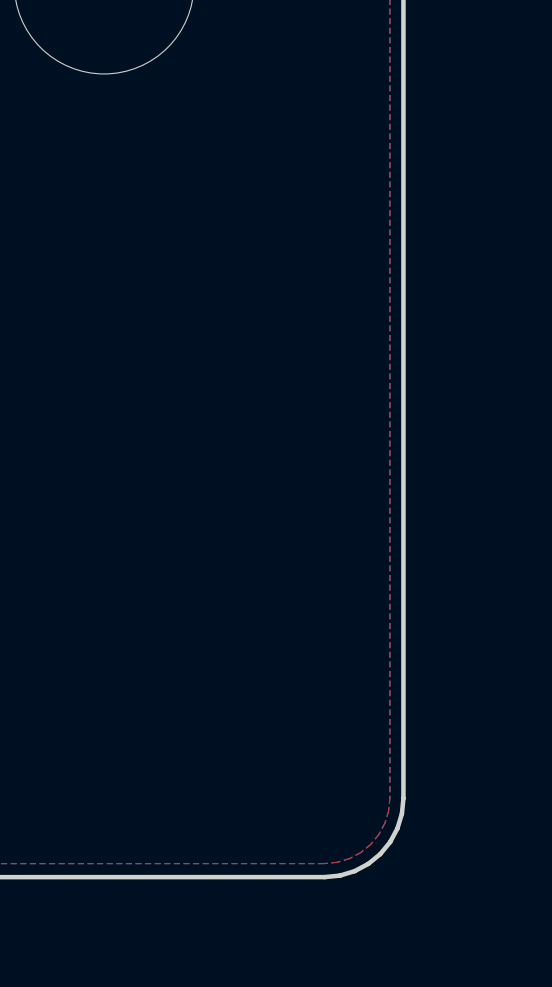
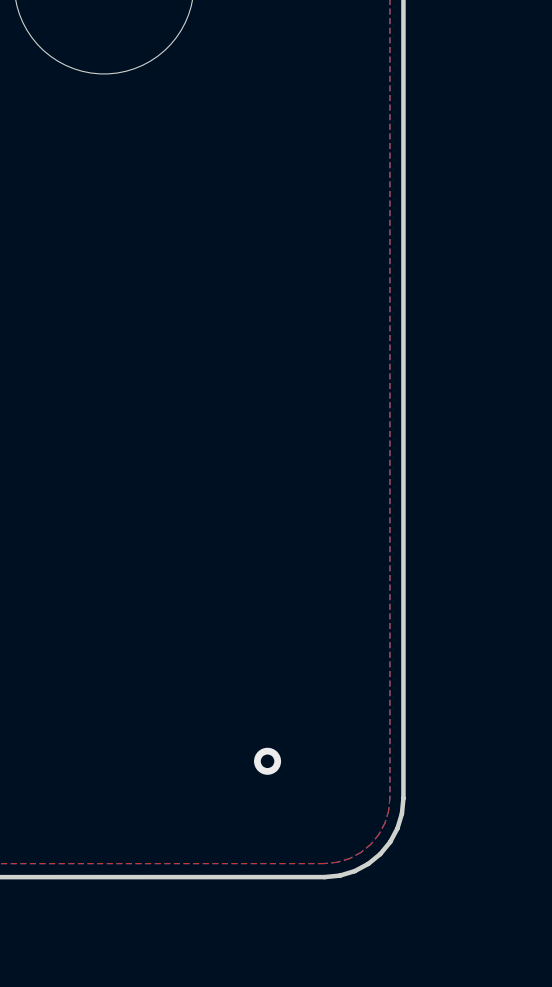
via: none -> (267, 761)

